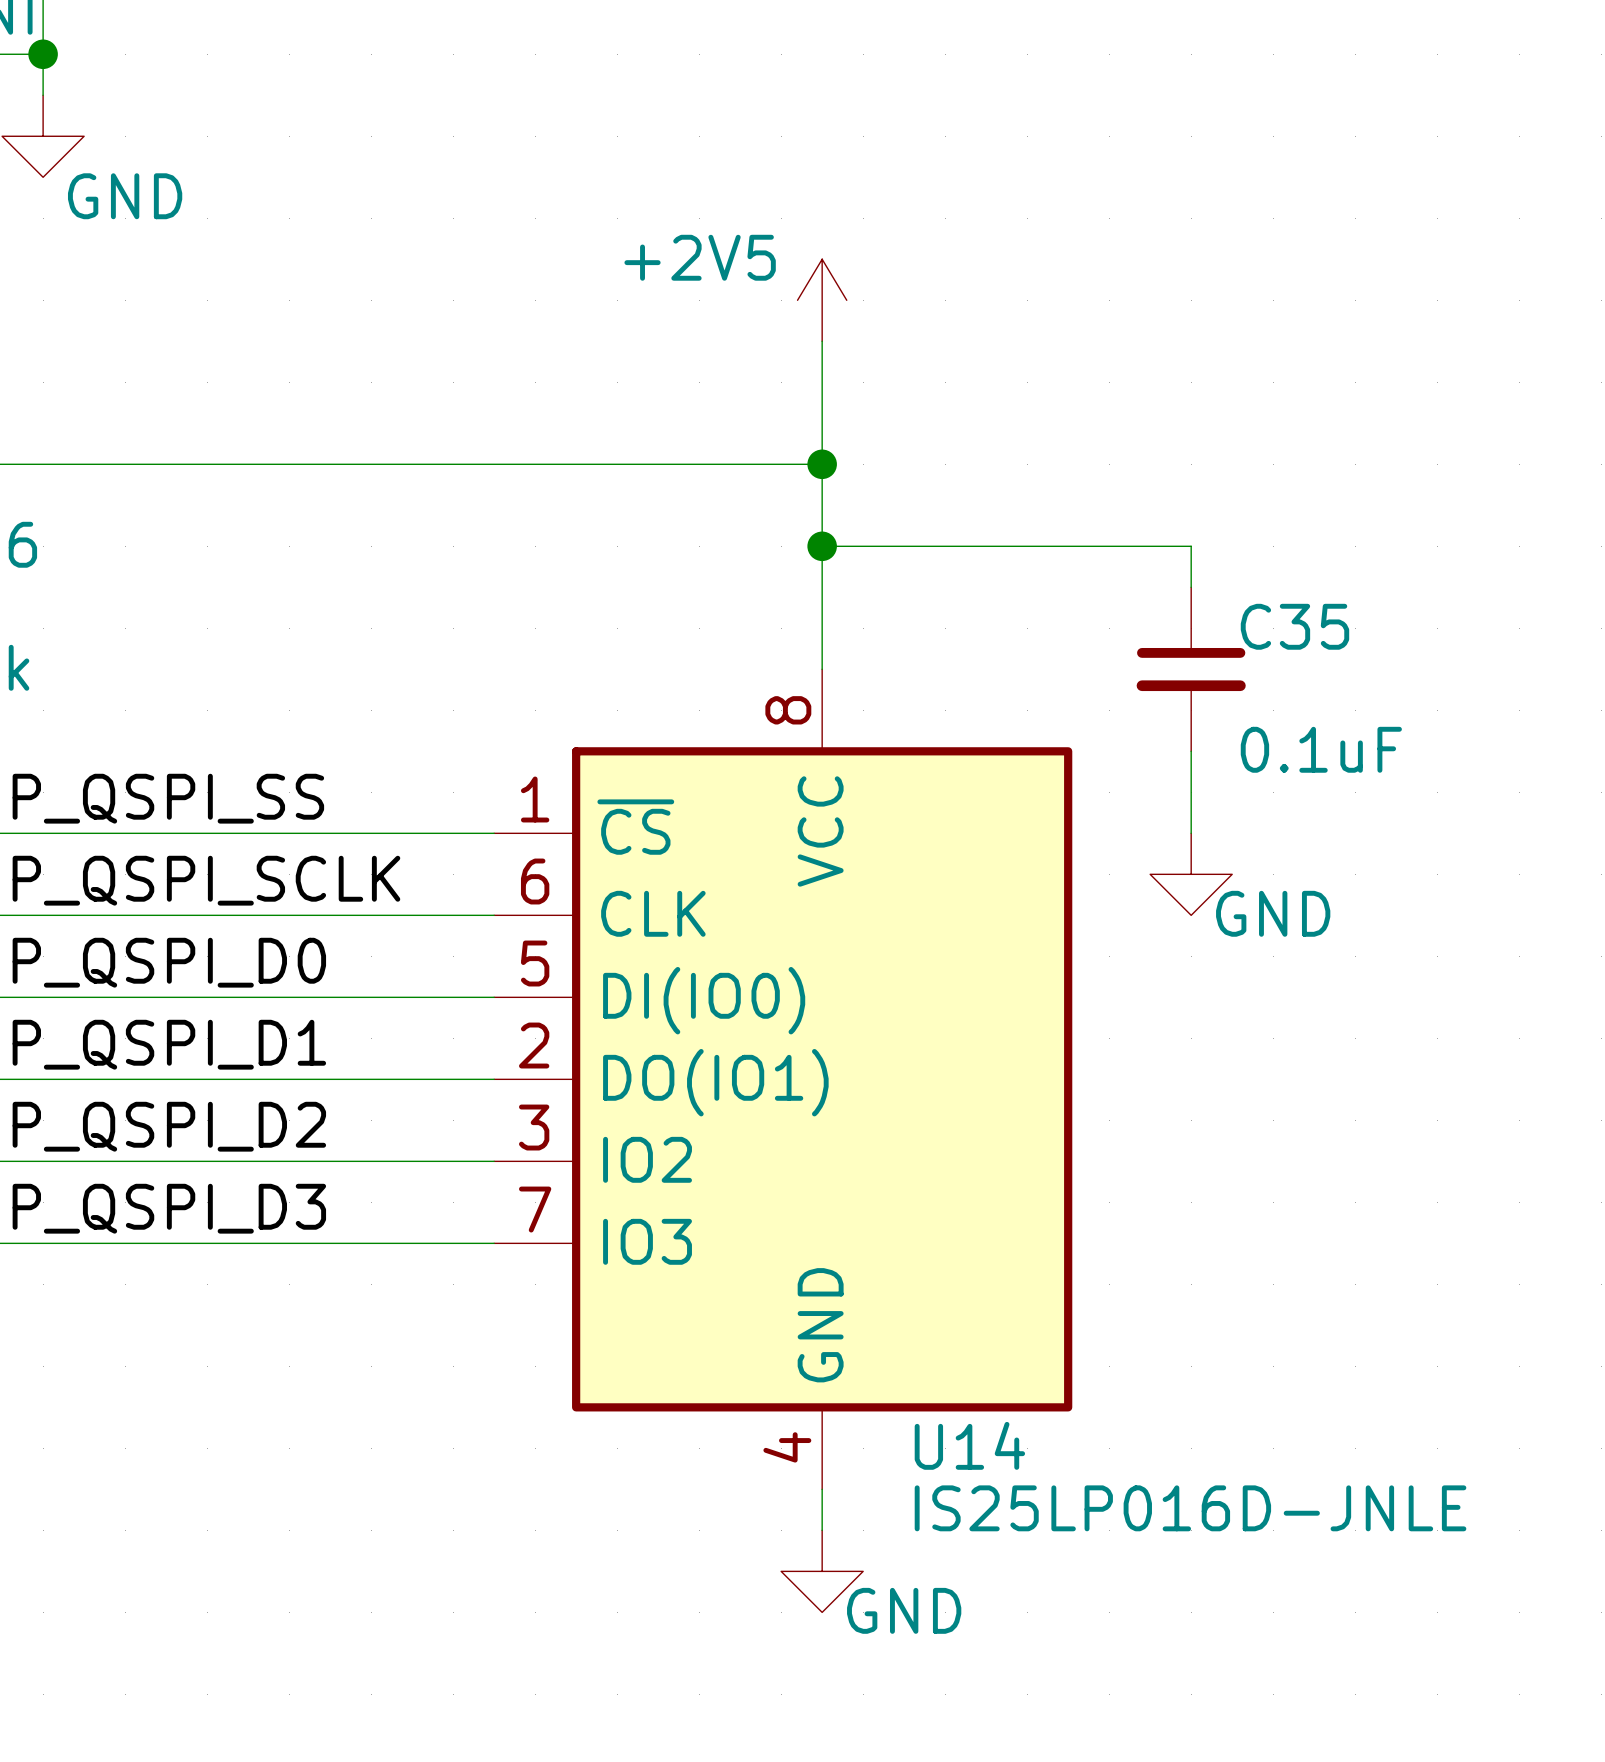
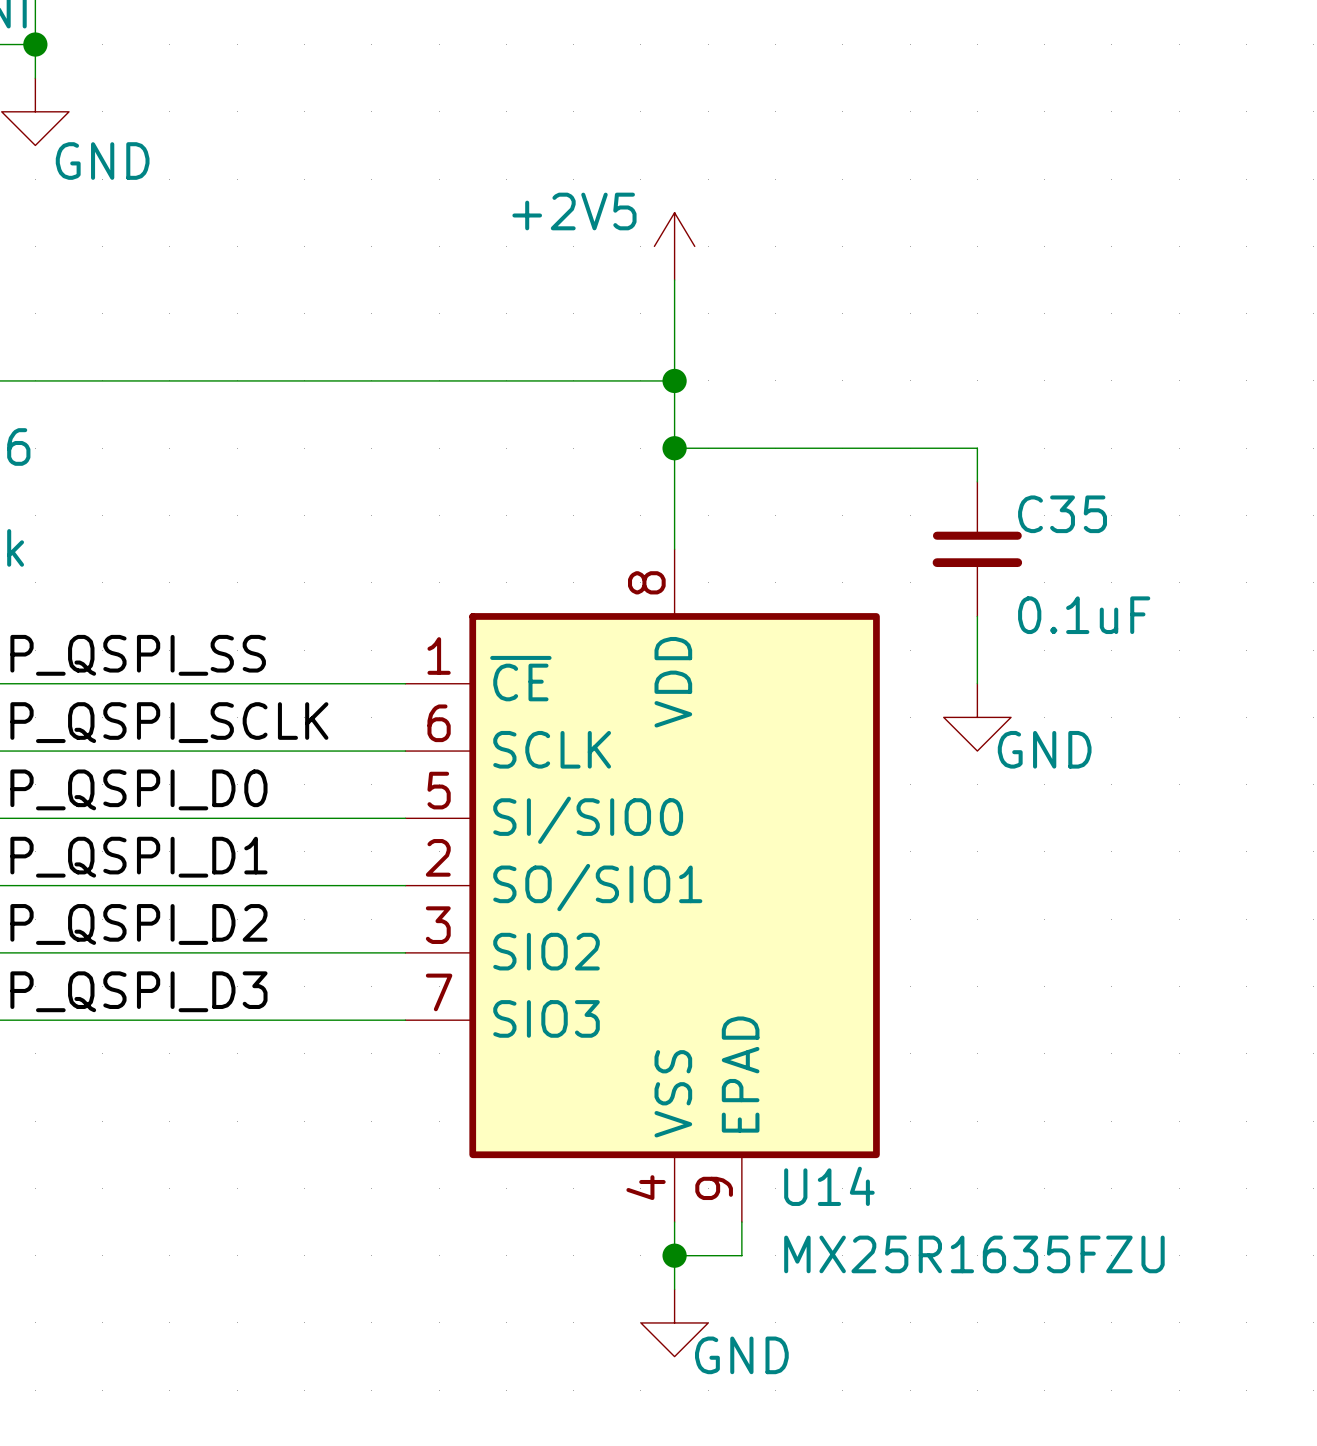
U14 symbol: [494, 669, 1073, 1490] -> [405, 549, 880, 1223]
wire: none -> (741, 1222) (741, 1255) (674, 1255) (674, 1289)
U14 value: IS25LP016D-JNLE (1190, 1508) -> MX25R1635FZU (974, 1254)
junction: none -> (674, 1255)
power symbol position: GND (822, 1571) -> GND (674, 1322)

